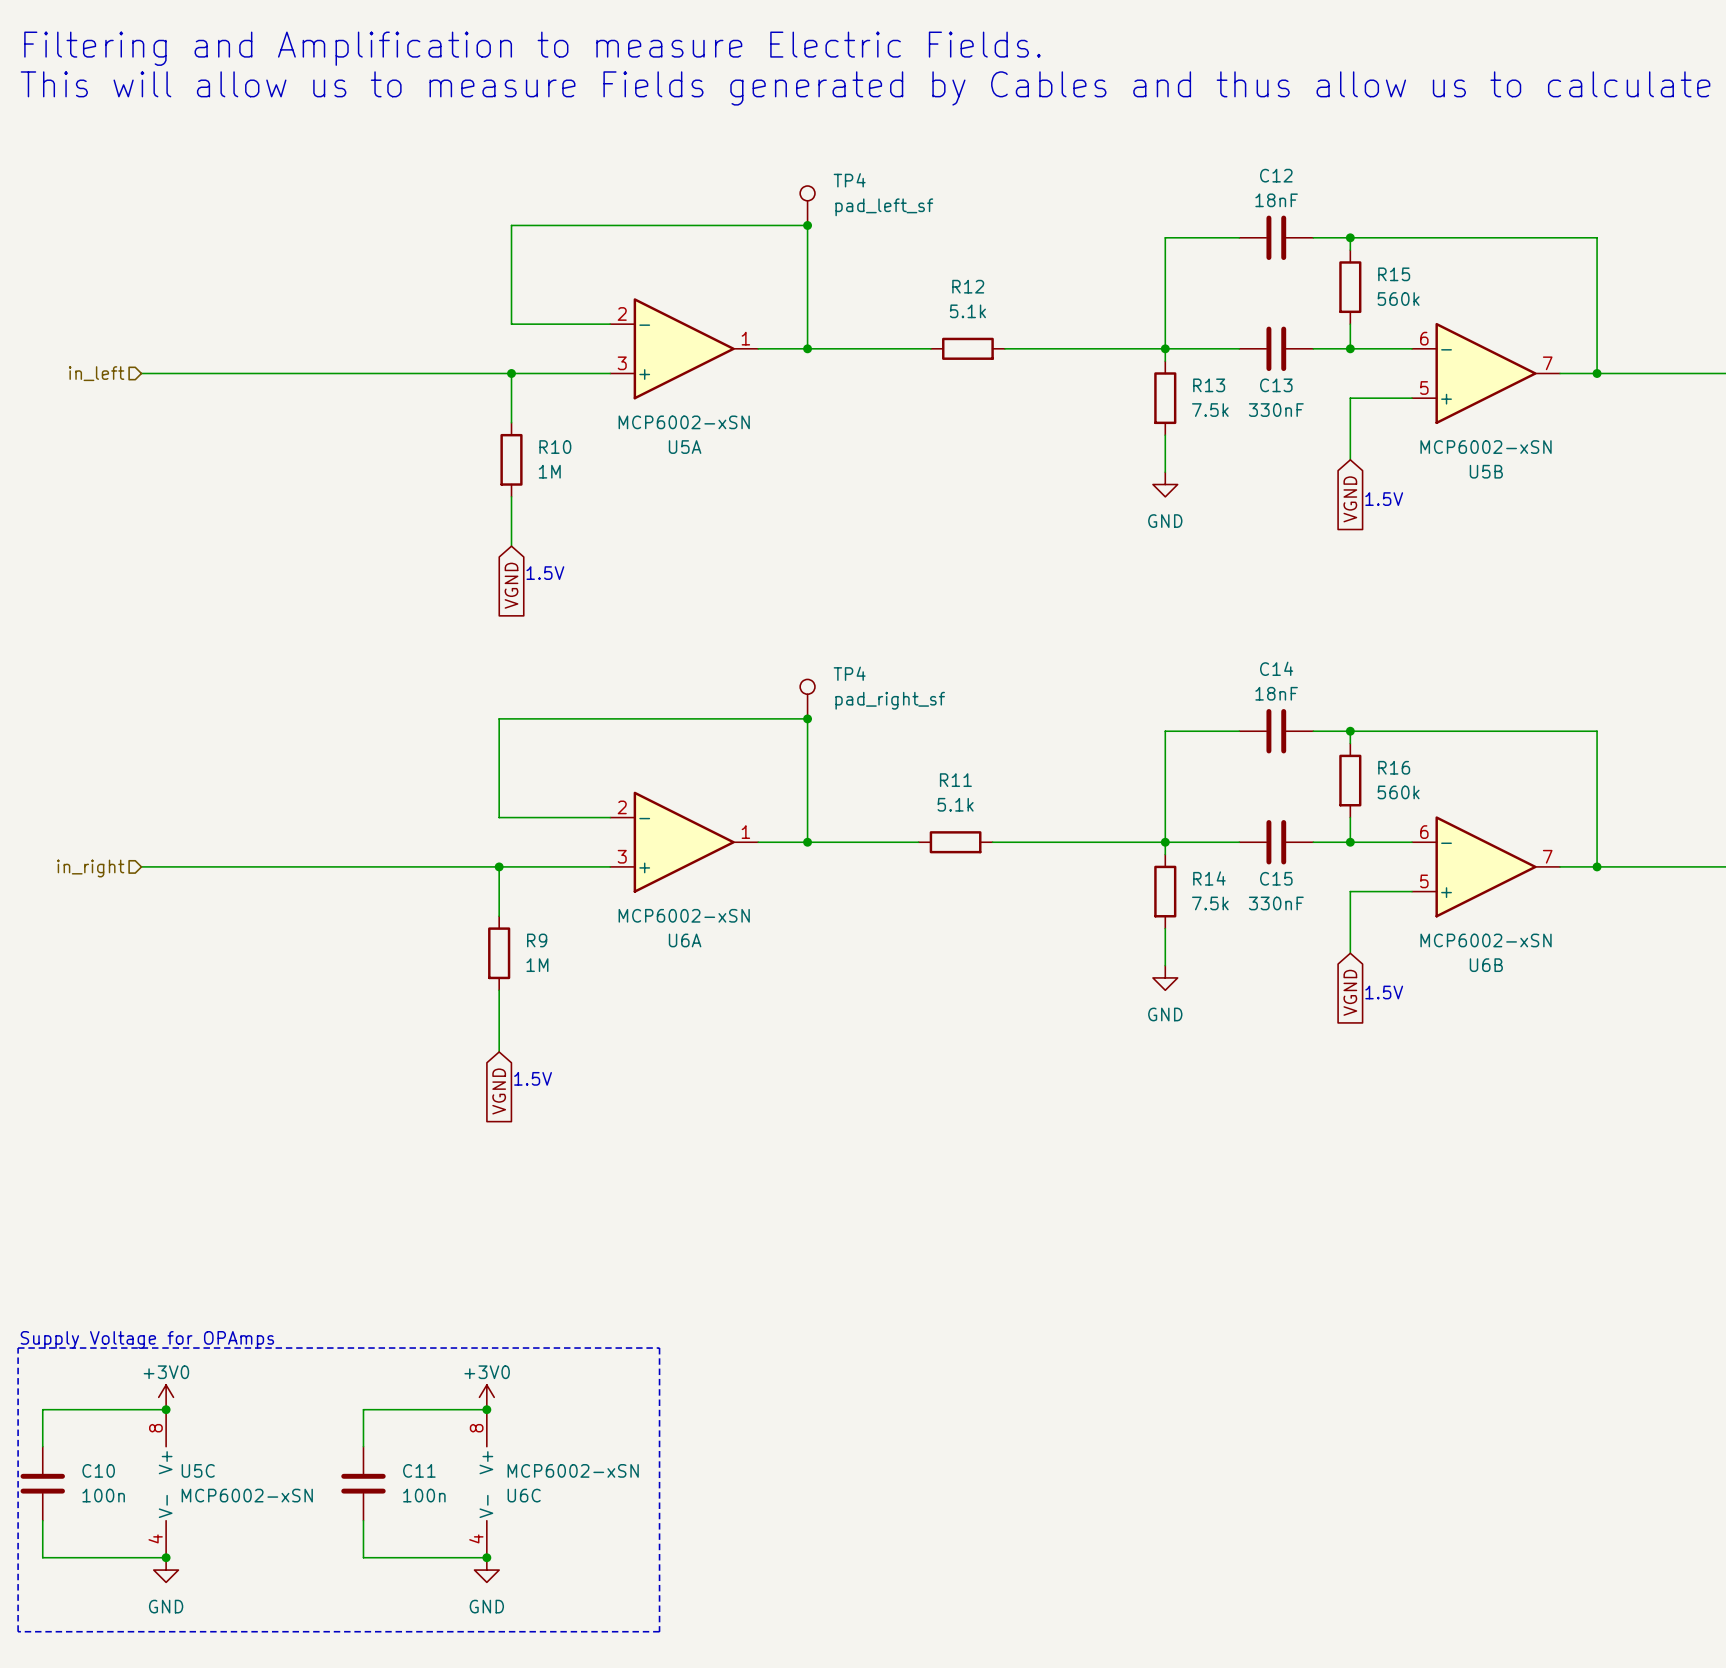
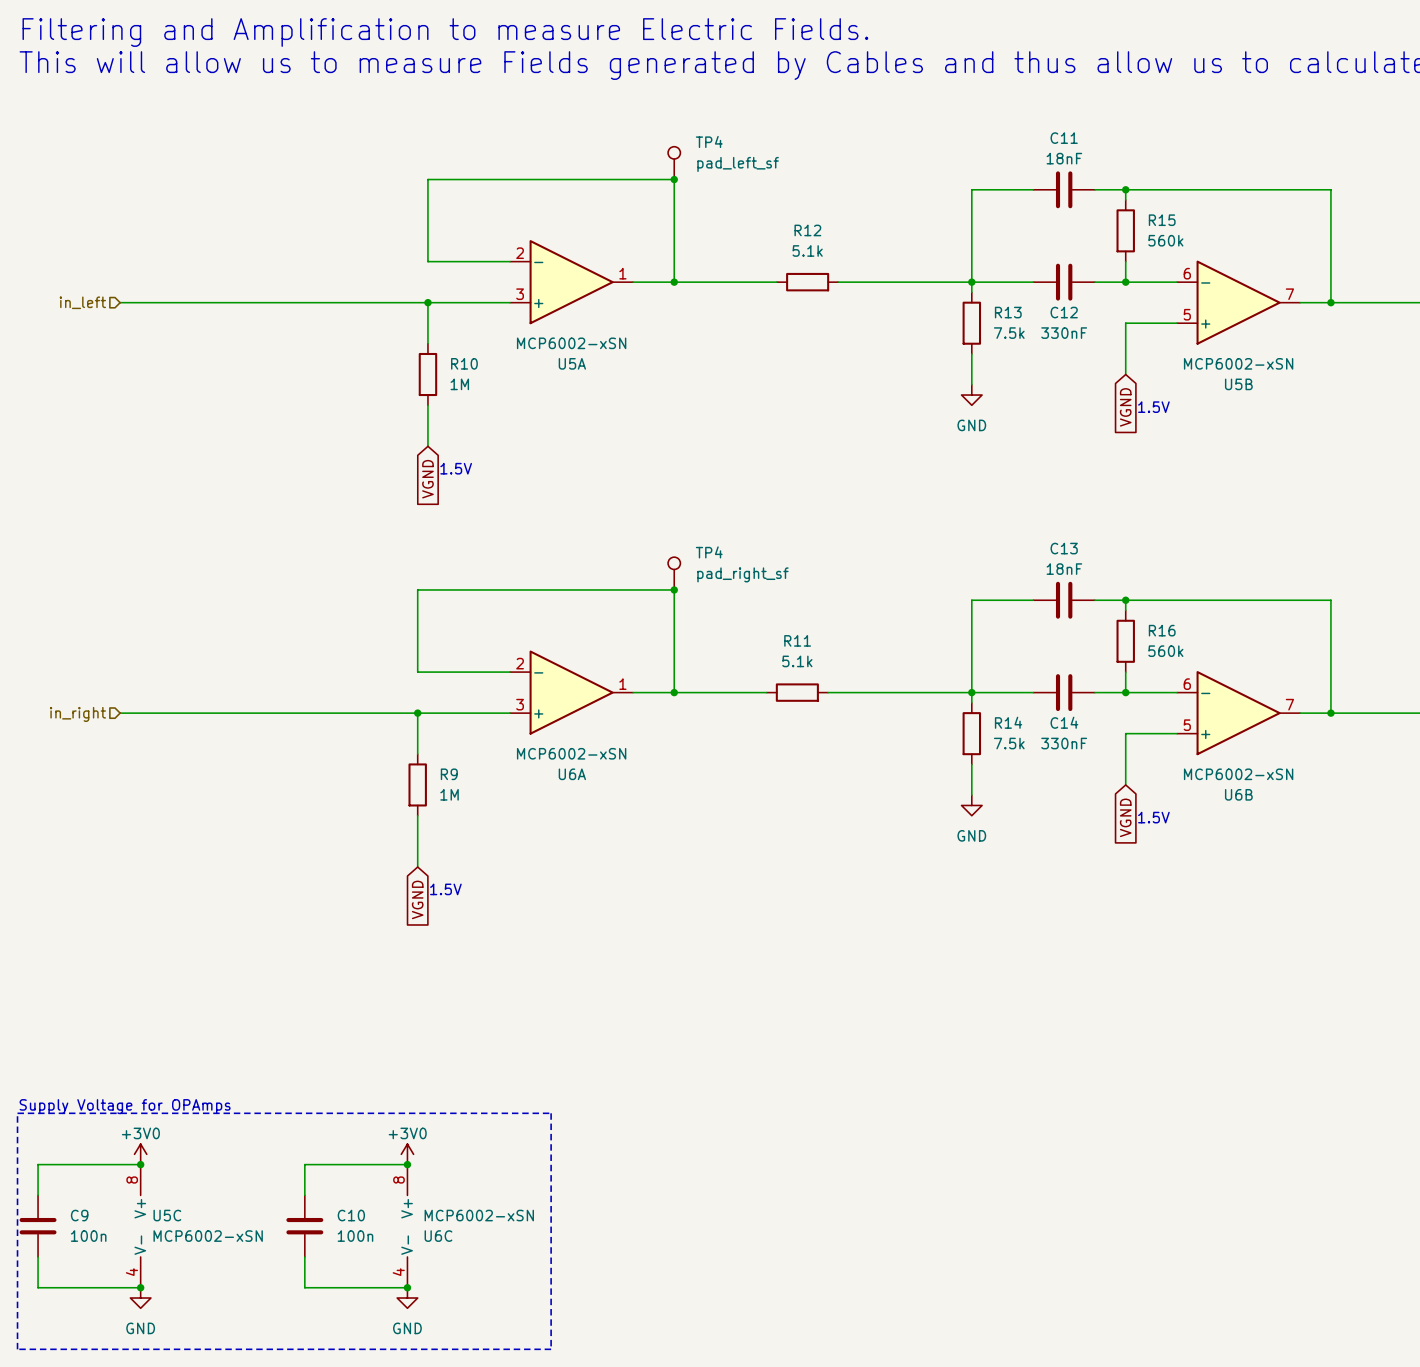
C12 name: C12 (1276, 175) -> C11 (1064, 138)
C13 name: C13 (1276, 385) -> C12 (1064, 312)
C14 name: C14 (1276, 668) -> C13 (1064, 548)
C15 name: C15 (1276, 878) -> C14 (1064, 722)
C10 name: C10 (98, 1470) -> C9 (79, 1215)
C11 name: C11 (419, 1470) -> C10 (351, 1215)

